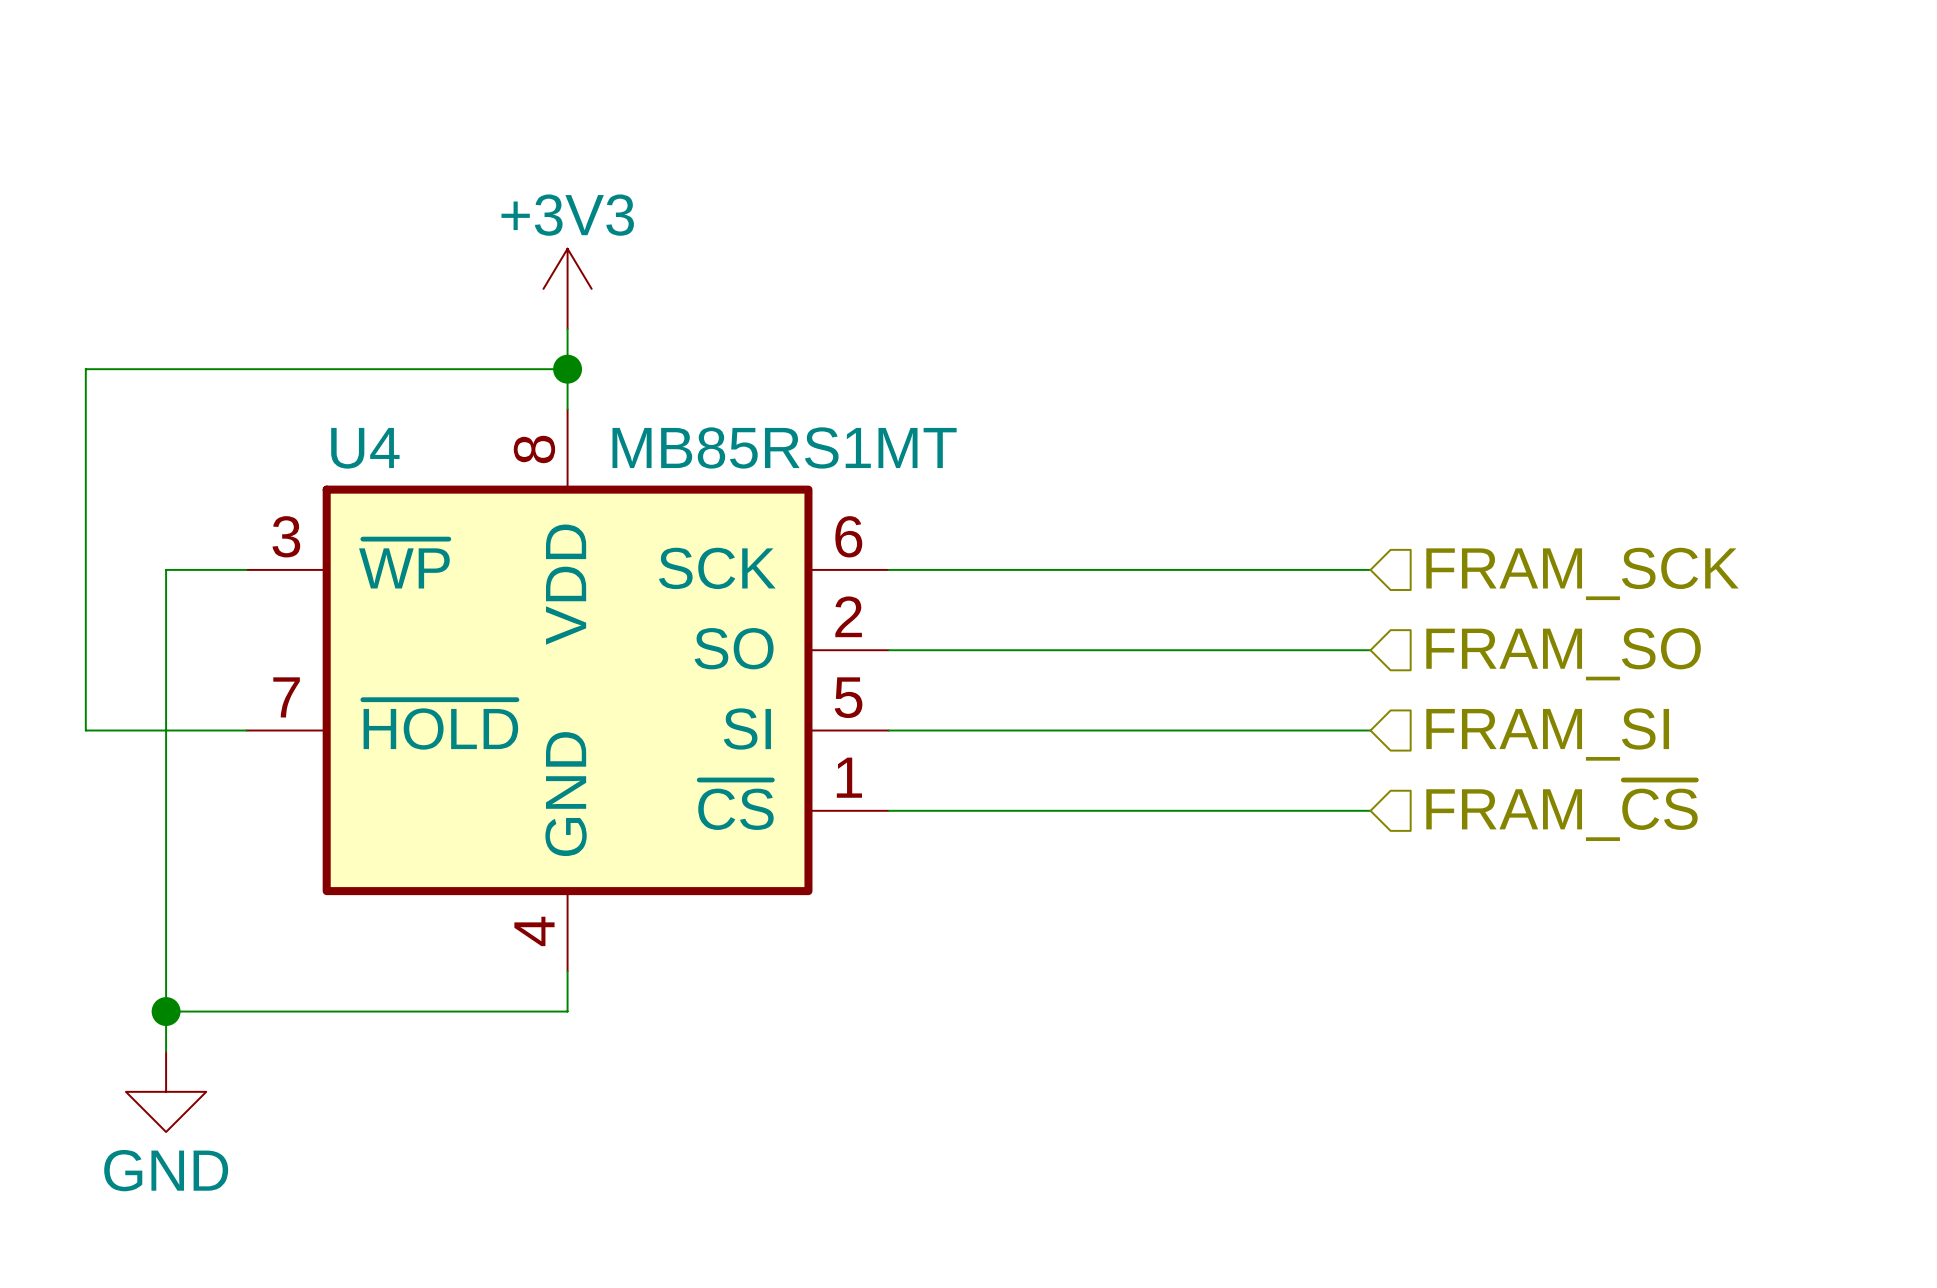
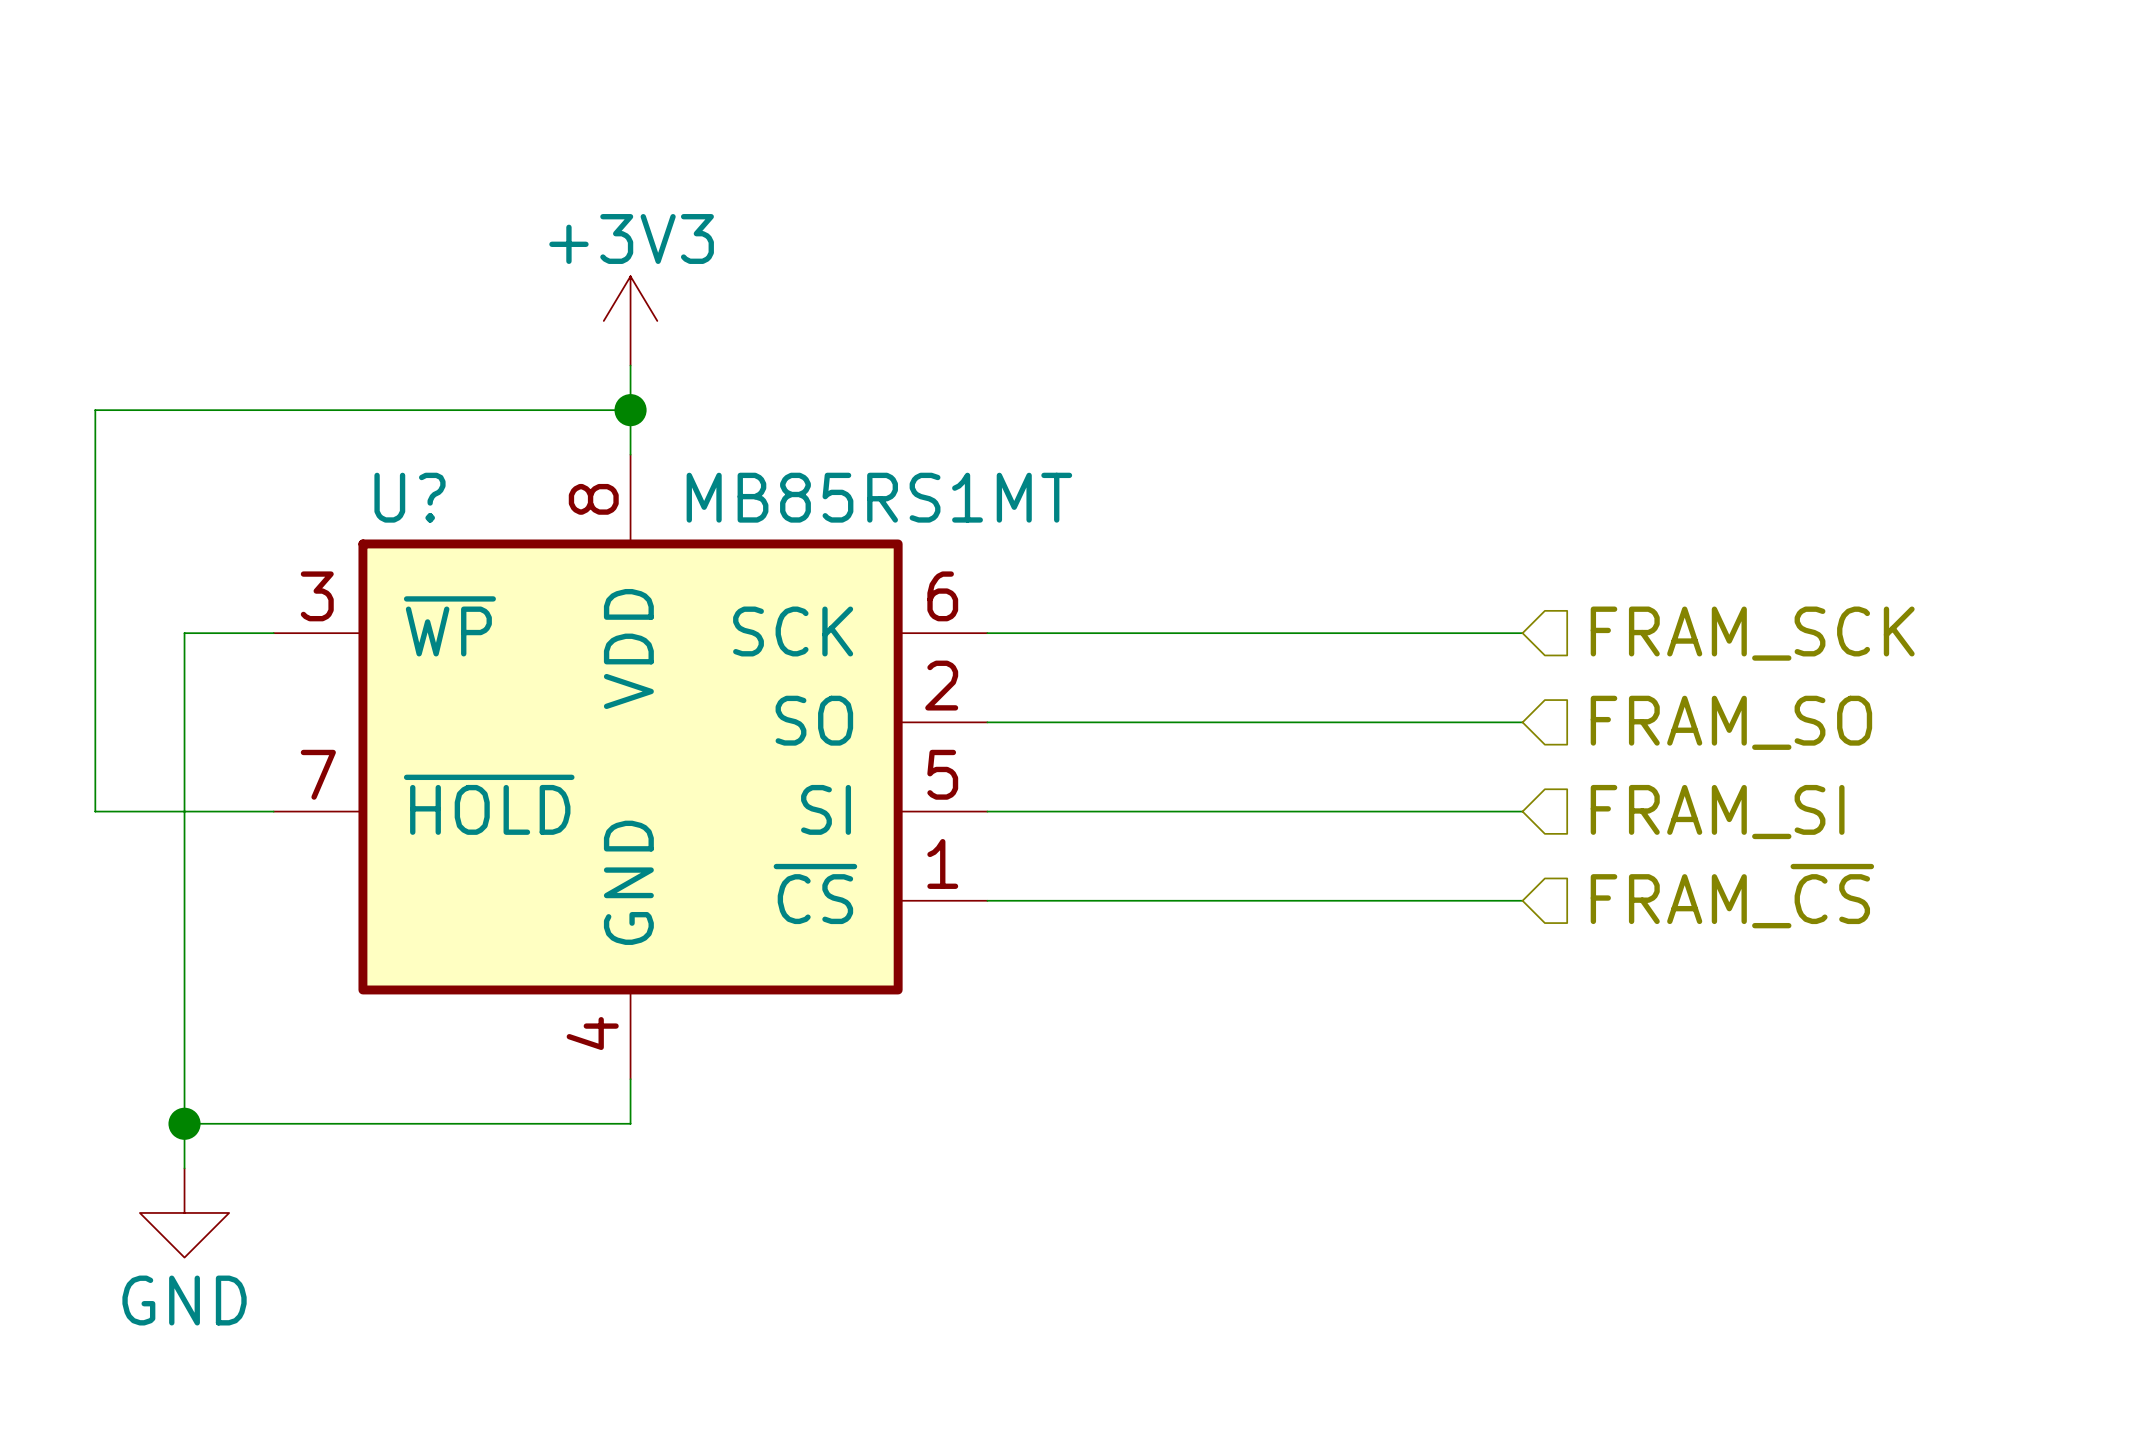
U4 name: U4 (365, 448) -> U? (409, 497)

